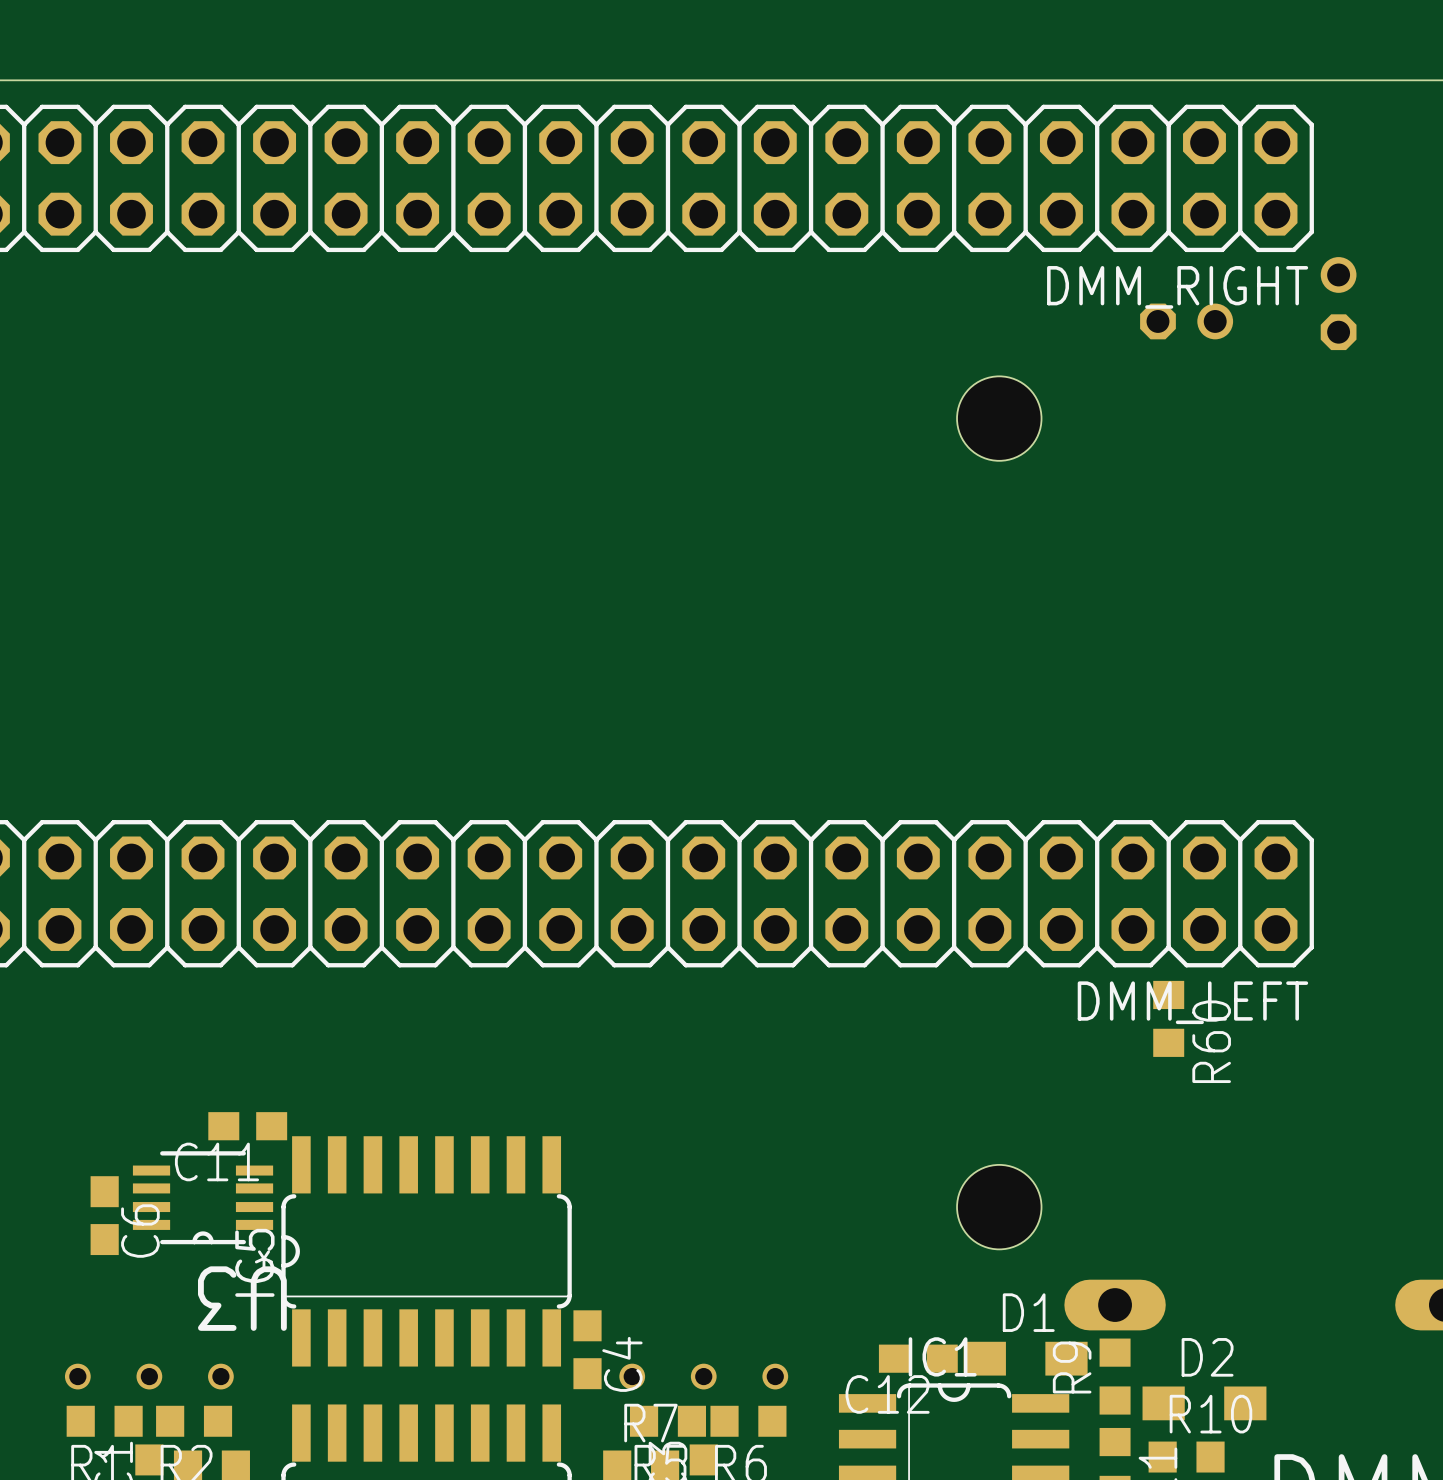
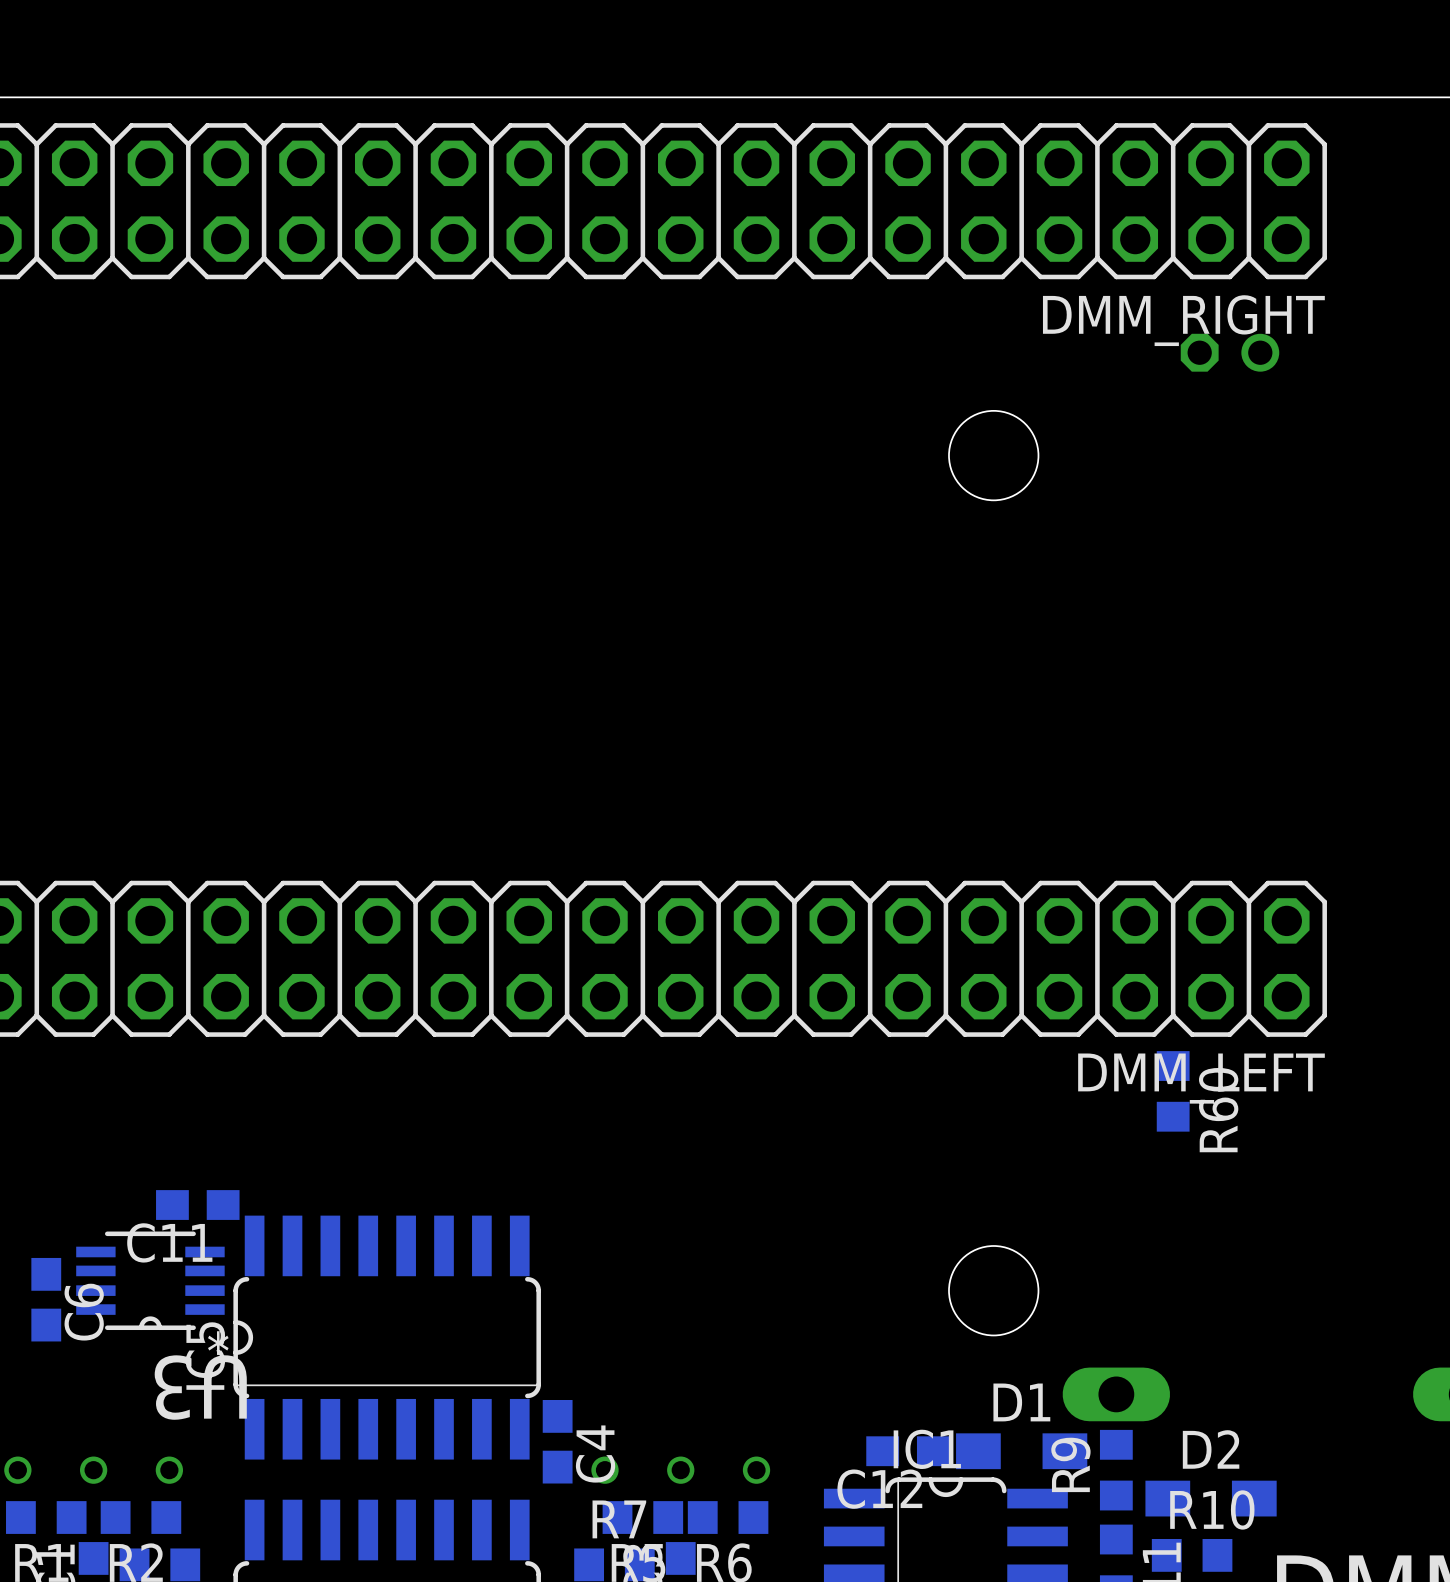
part: (1338, 303) -> none
part position: (1186, 321) -> (1229, 352)

